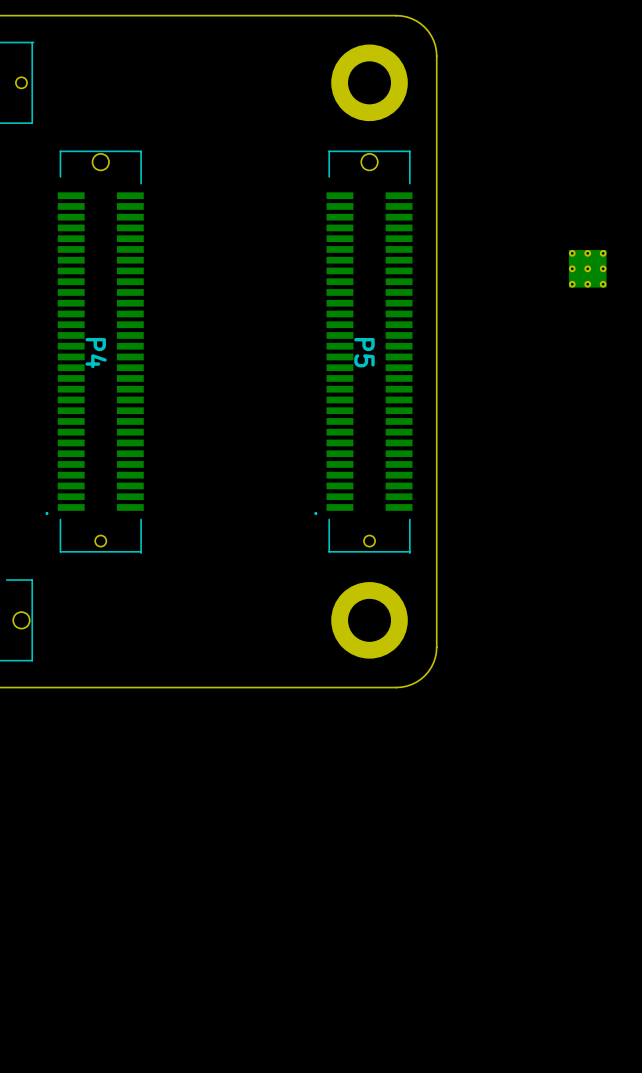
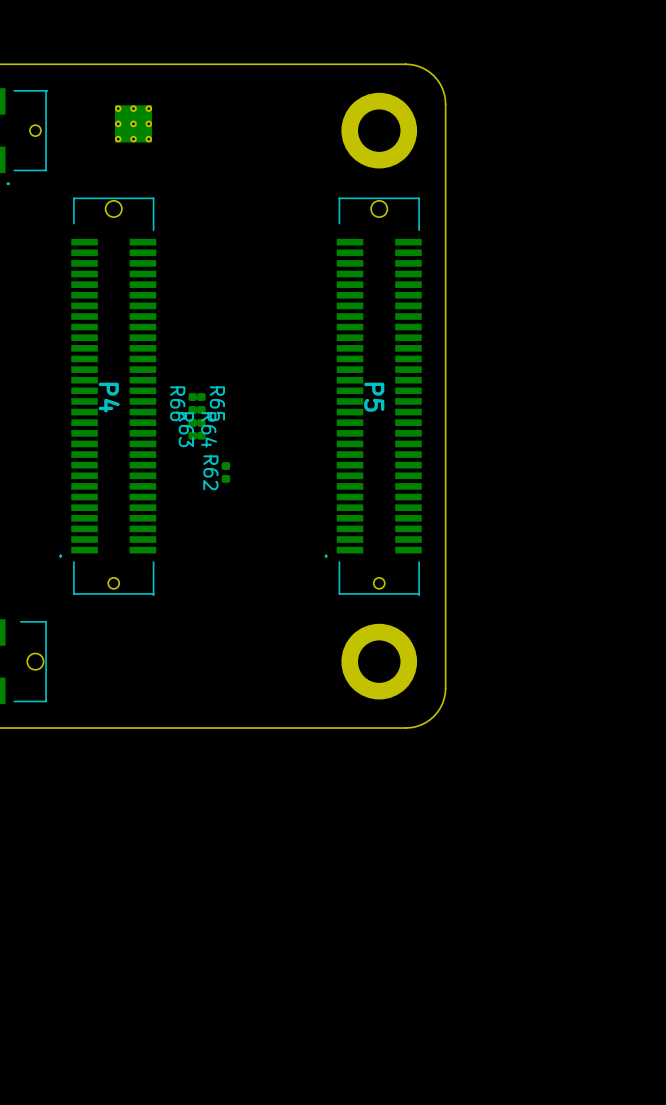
part: none -> (133, 123)
part: (587, 268) -> none
R66: none -> (192, 403)
R65: none -> (201, 403)
R64: none -> (192, 429)
R63: none -> (201, 429)
R62: none -> (225, 472)

